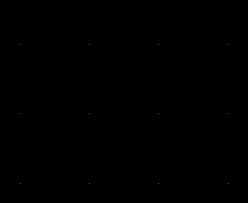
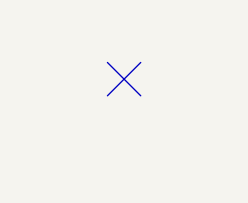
no-connect mark: none -> (124, 79)

